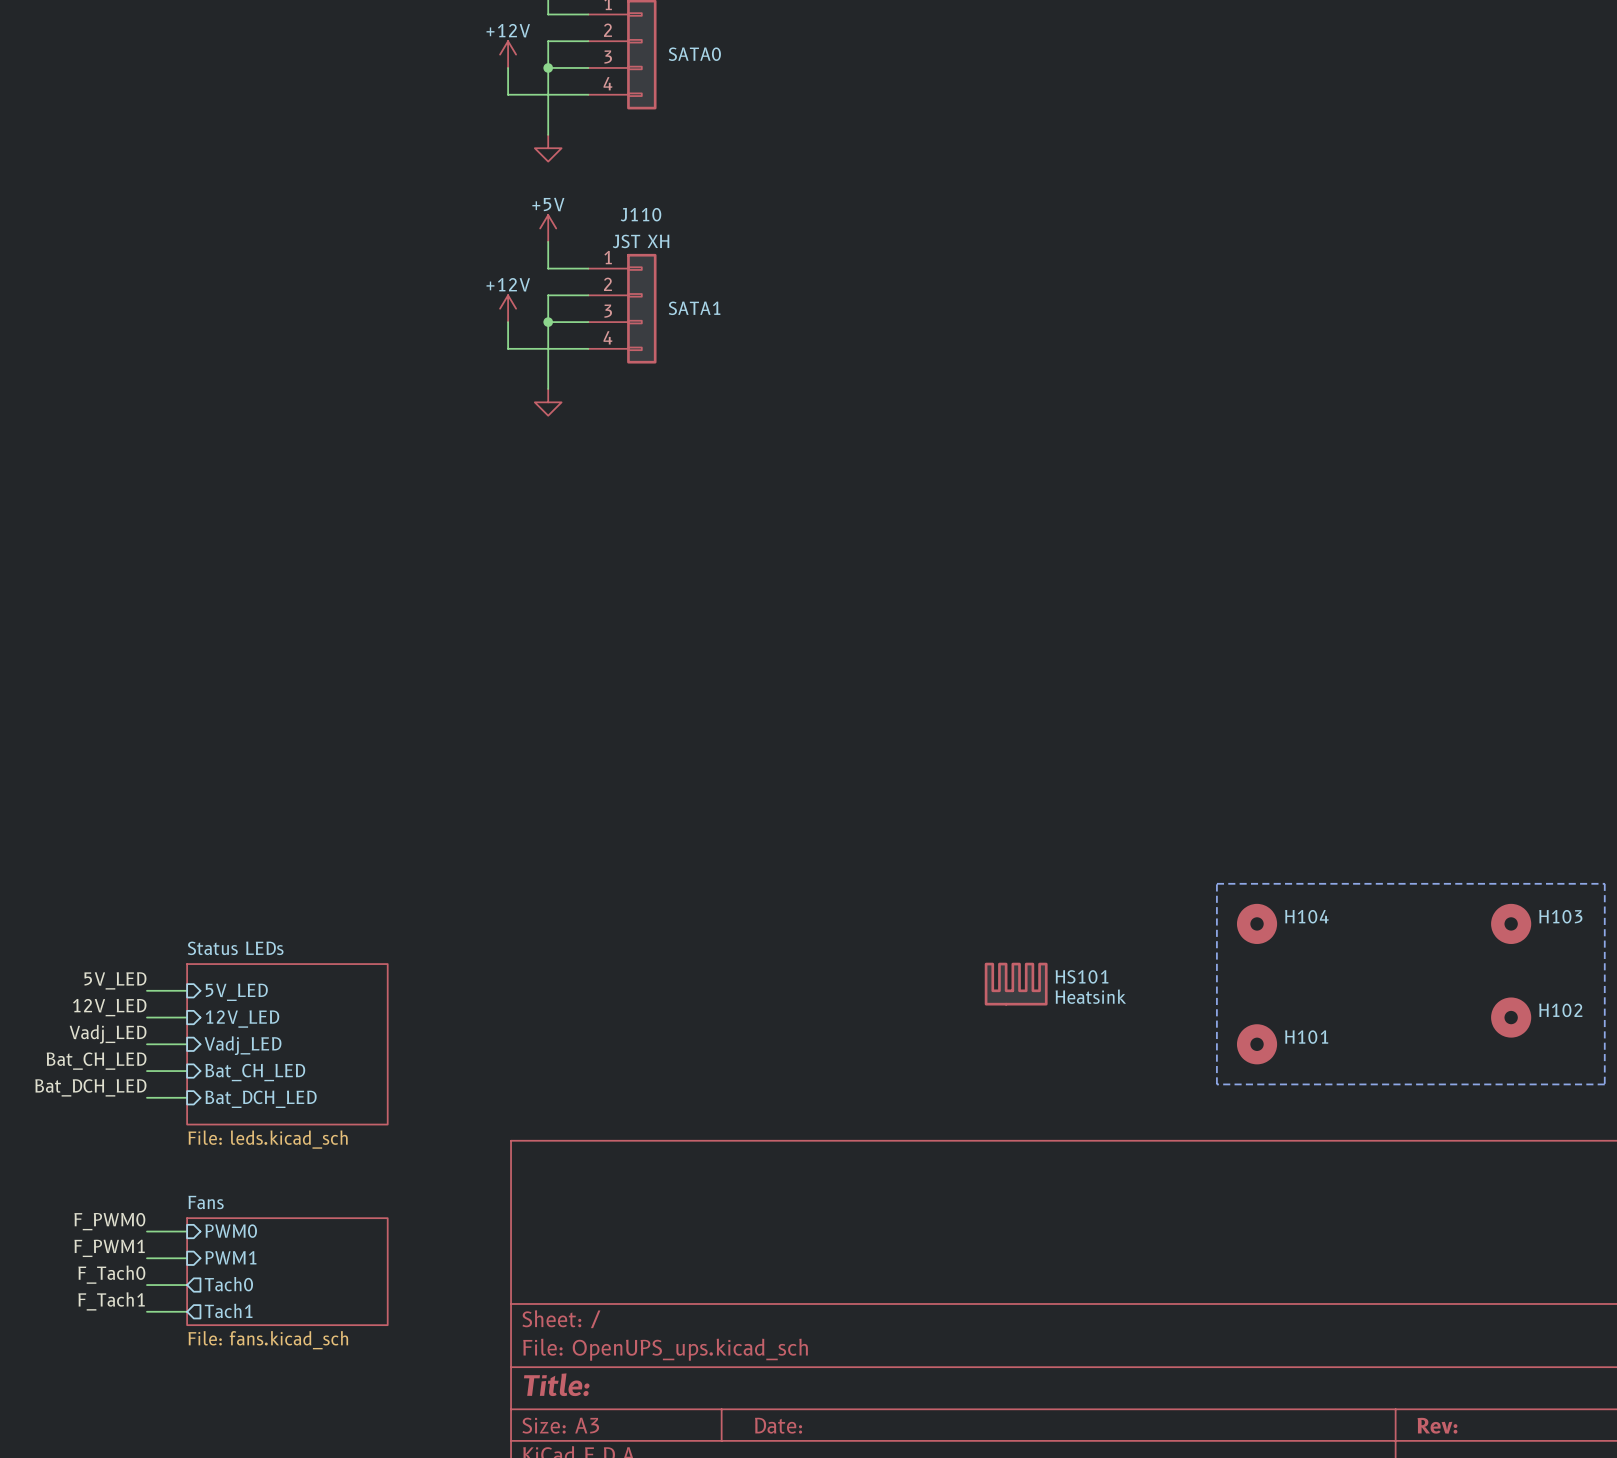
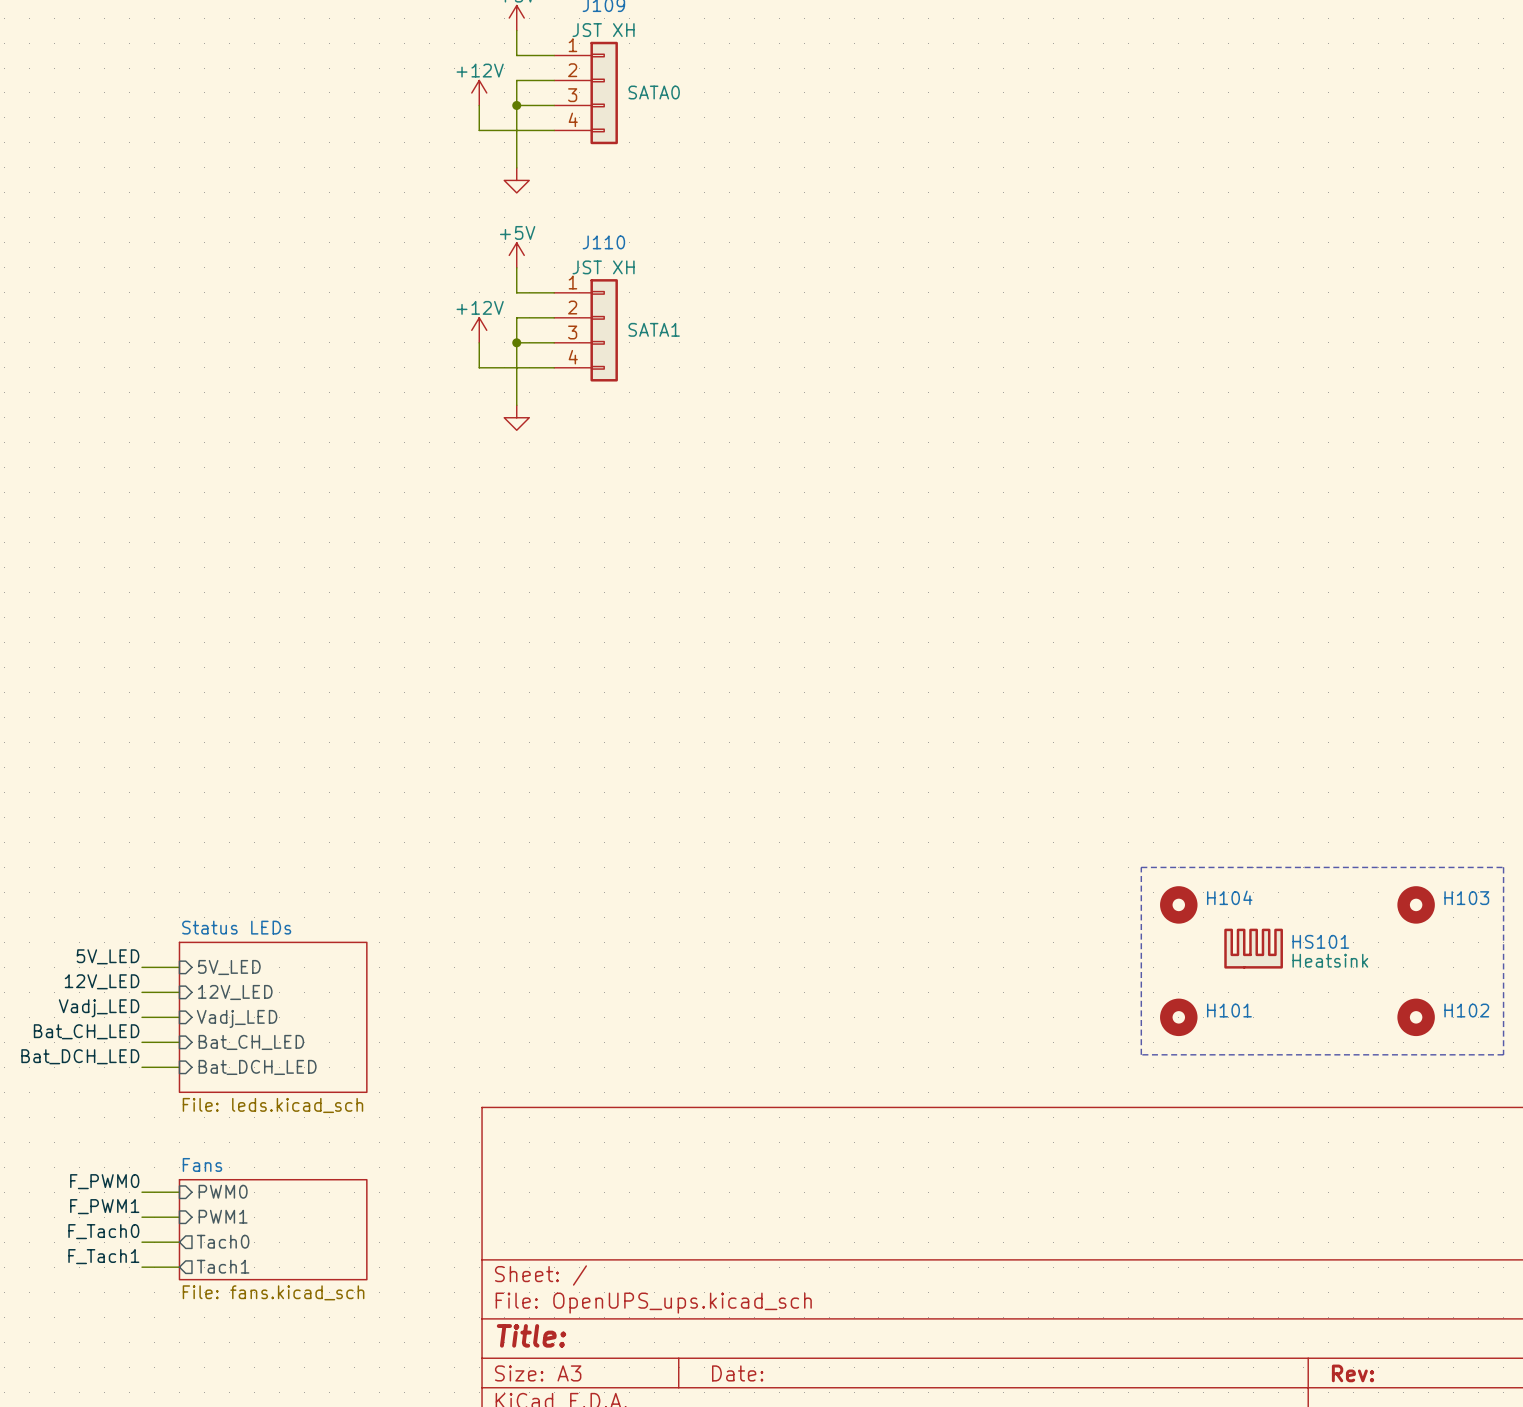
HS101 position: (1016, 984) -> (1253, 948)
H102 position: (1511, 1017) -> (1416, 1017)

